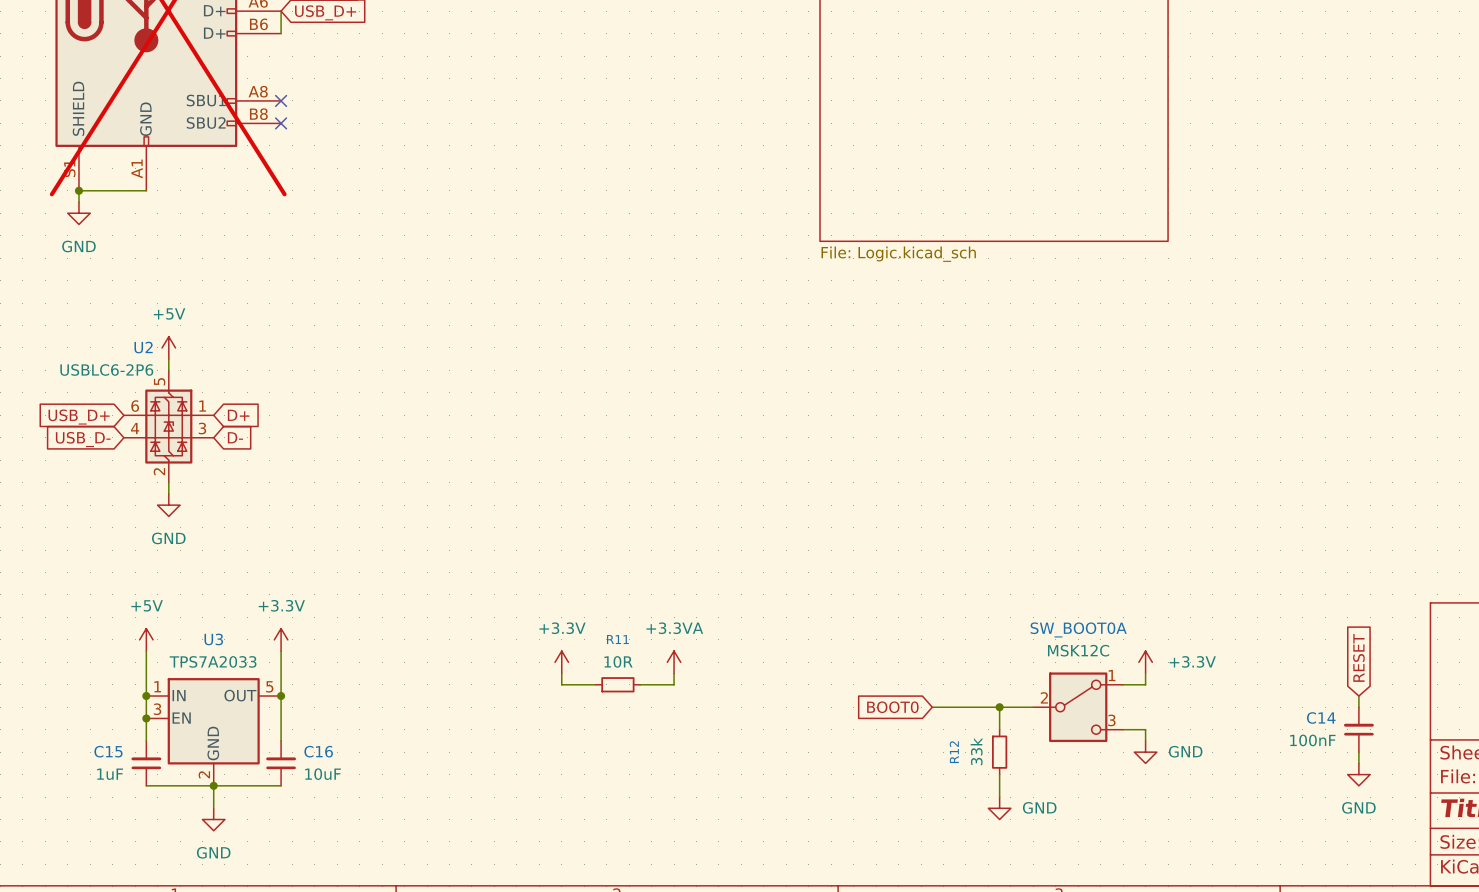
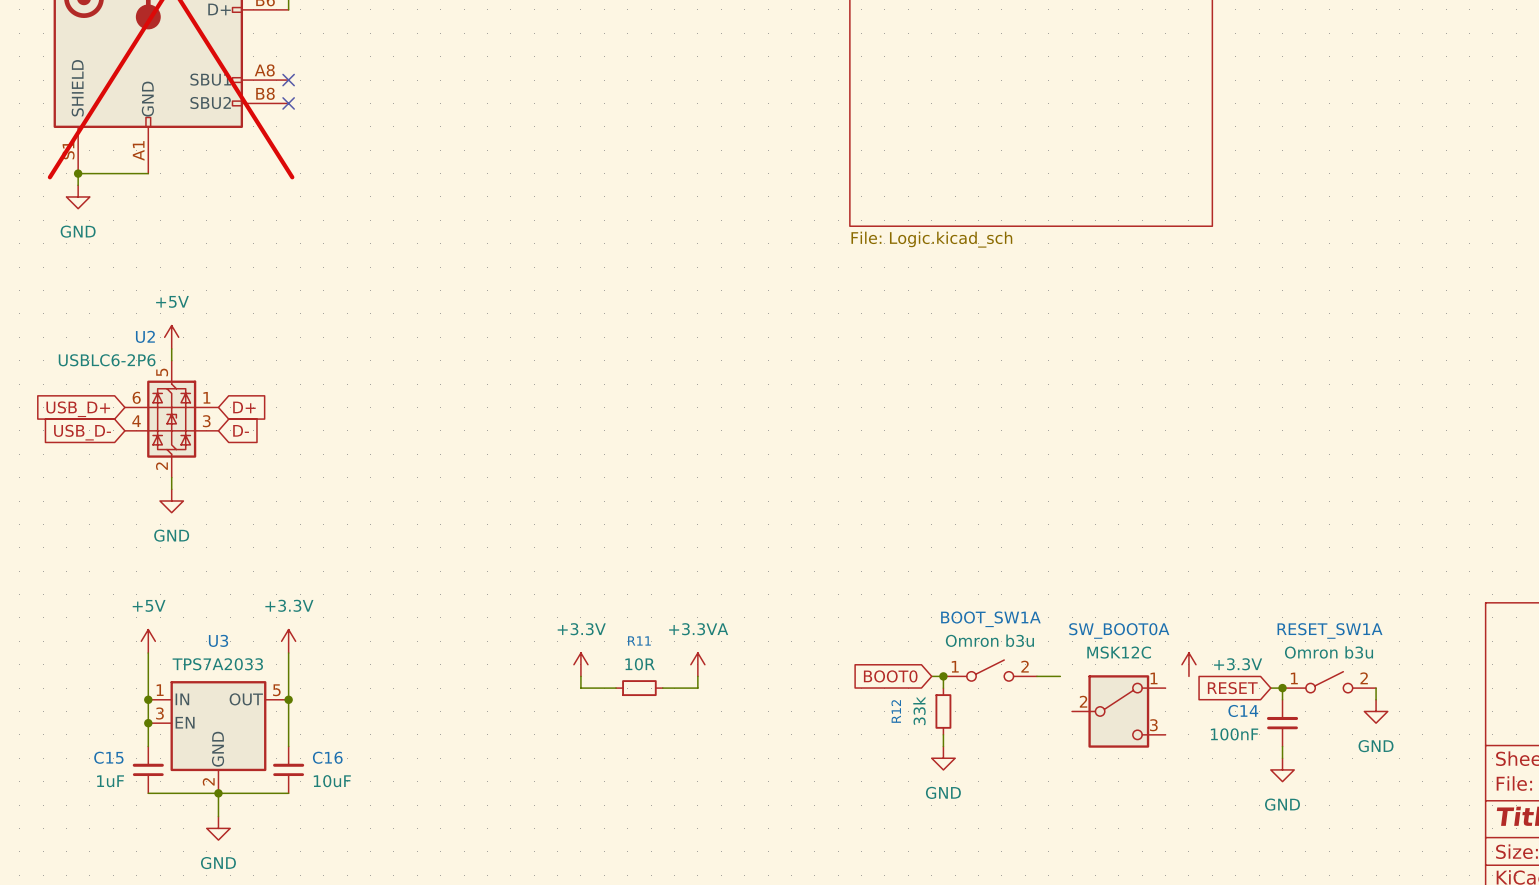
global label rotation: 0° (1358, 657) -> 90° counterclockwise (1232, 688)
global label position: RESET (1358, 657) -> RESET (1232, 688)
BOOT_SW1A: none -> Omron b3u (990, 670)
wire: none -> (931, 676) (943, 676) (943, 688)
junction: none -> (943, 676)
wire: none -> (1036, 676) (1060, 676)
wire: (1145, 673) (1145, 684) (1123, 684) -> none
RESET_SW1A: none -> Omron b3u (1329, 682)
wire: none -> (1270, 688) (1282, 688) (1282, 699)
junction: none -> (1282, 688)
wire: (1358, 696) (1358, 707) -> (1376, 688) (1376, 699)
global label position: BOOT0 (892, 707) -> BOOT0 (890, 676)
wire: (932, 707) (1033, 707) -> none
wire: (999, 707) (999, 729) -> none
junction: (999, 707) -> none
power symbol: none -> GND (1376, 711)
wire: none -> (943, 734) (943, 746)
wire: (1123, 729) (1145, 729) (1145, 740) -> none
C14 position: (1358, 729) -> (1282, 723)
R12 position: (999, 752) -> (943, 711)
power symbol: GND (1145, 752) -> none
wire: (1358, 752) (1358, 763) -> (1282, 746) (1282, 758)
power symbol: none -> GND (1282, 769)
wire: (999, 774) (999, 797) -> none
power symbol: GND (1358, 774) -> none
power symbol text position: GND (1039, 807) -> GND (943, 792)
power symbol position: GND (999, 808) -> GND (943, 758)

